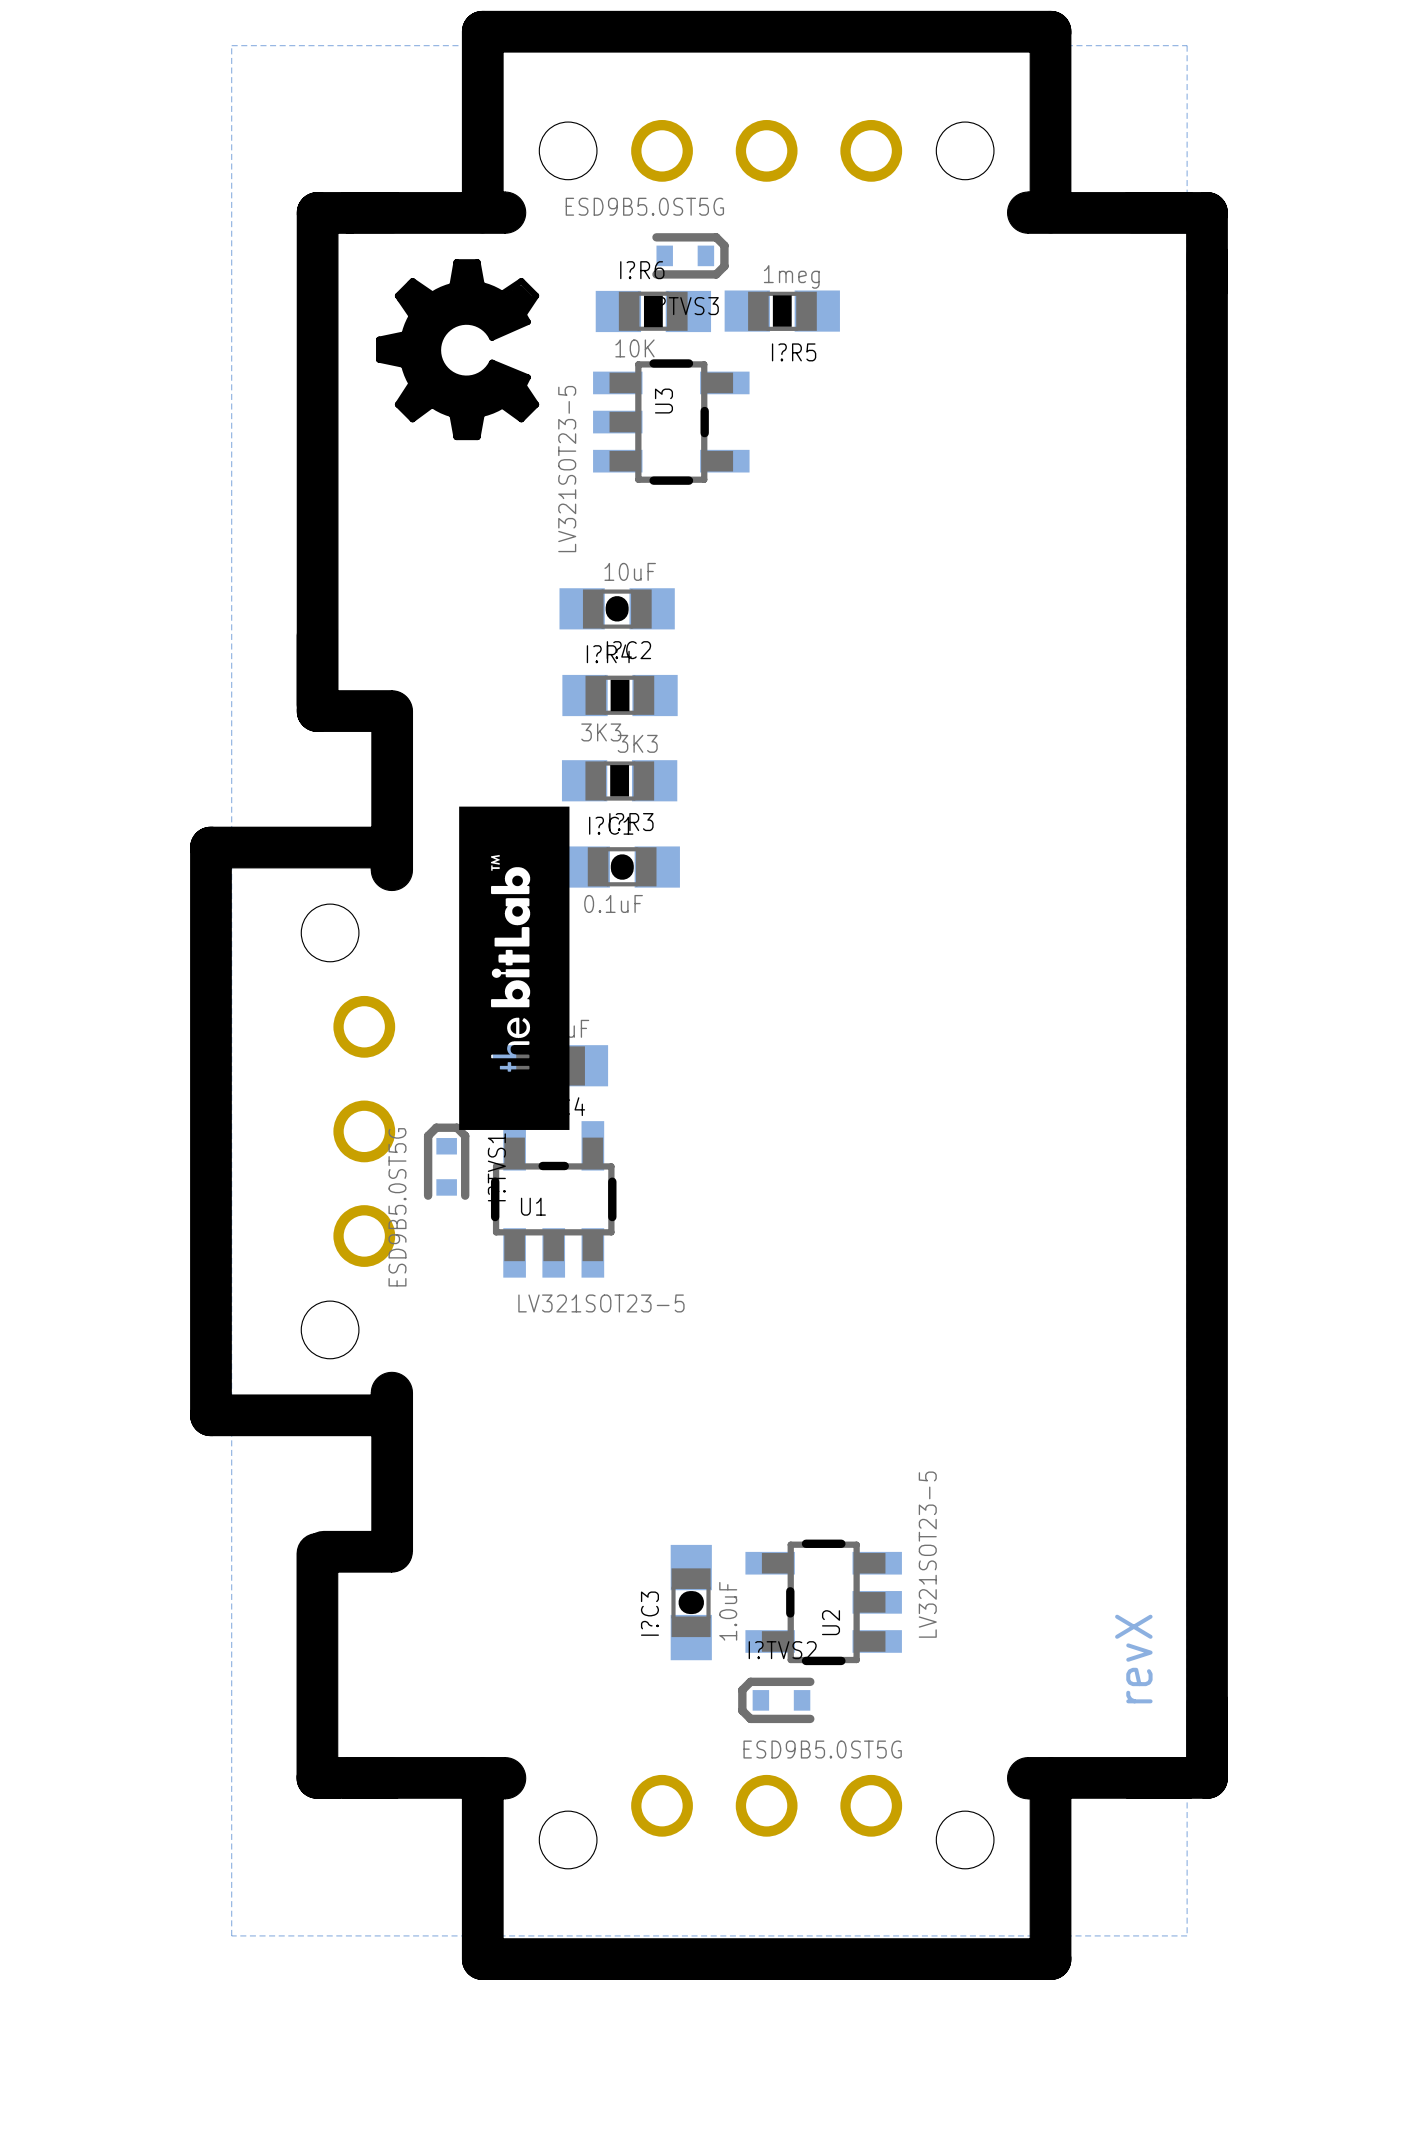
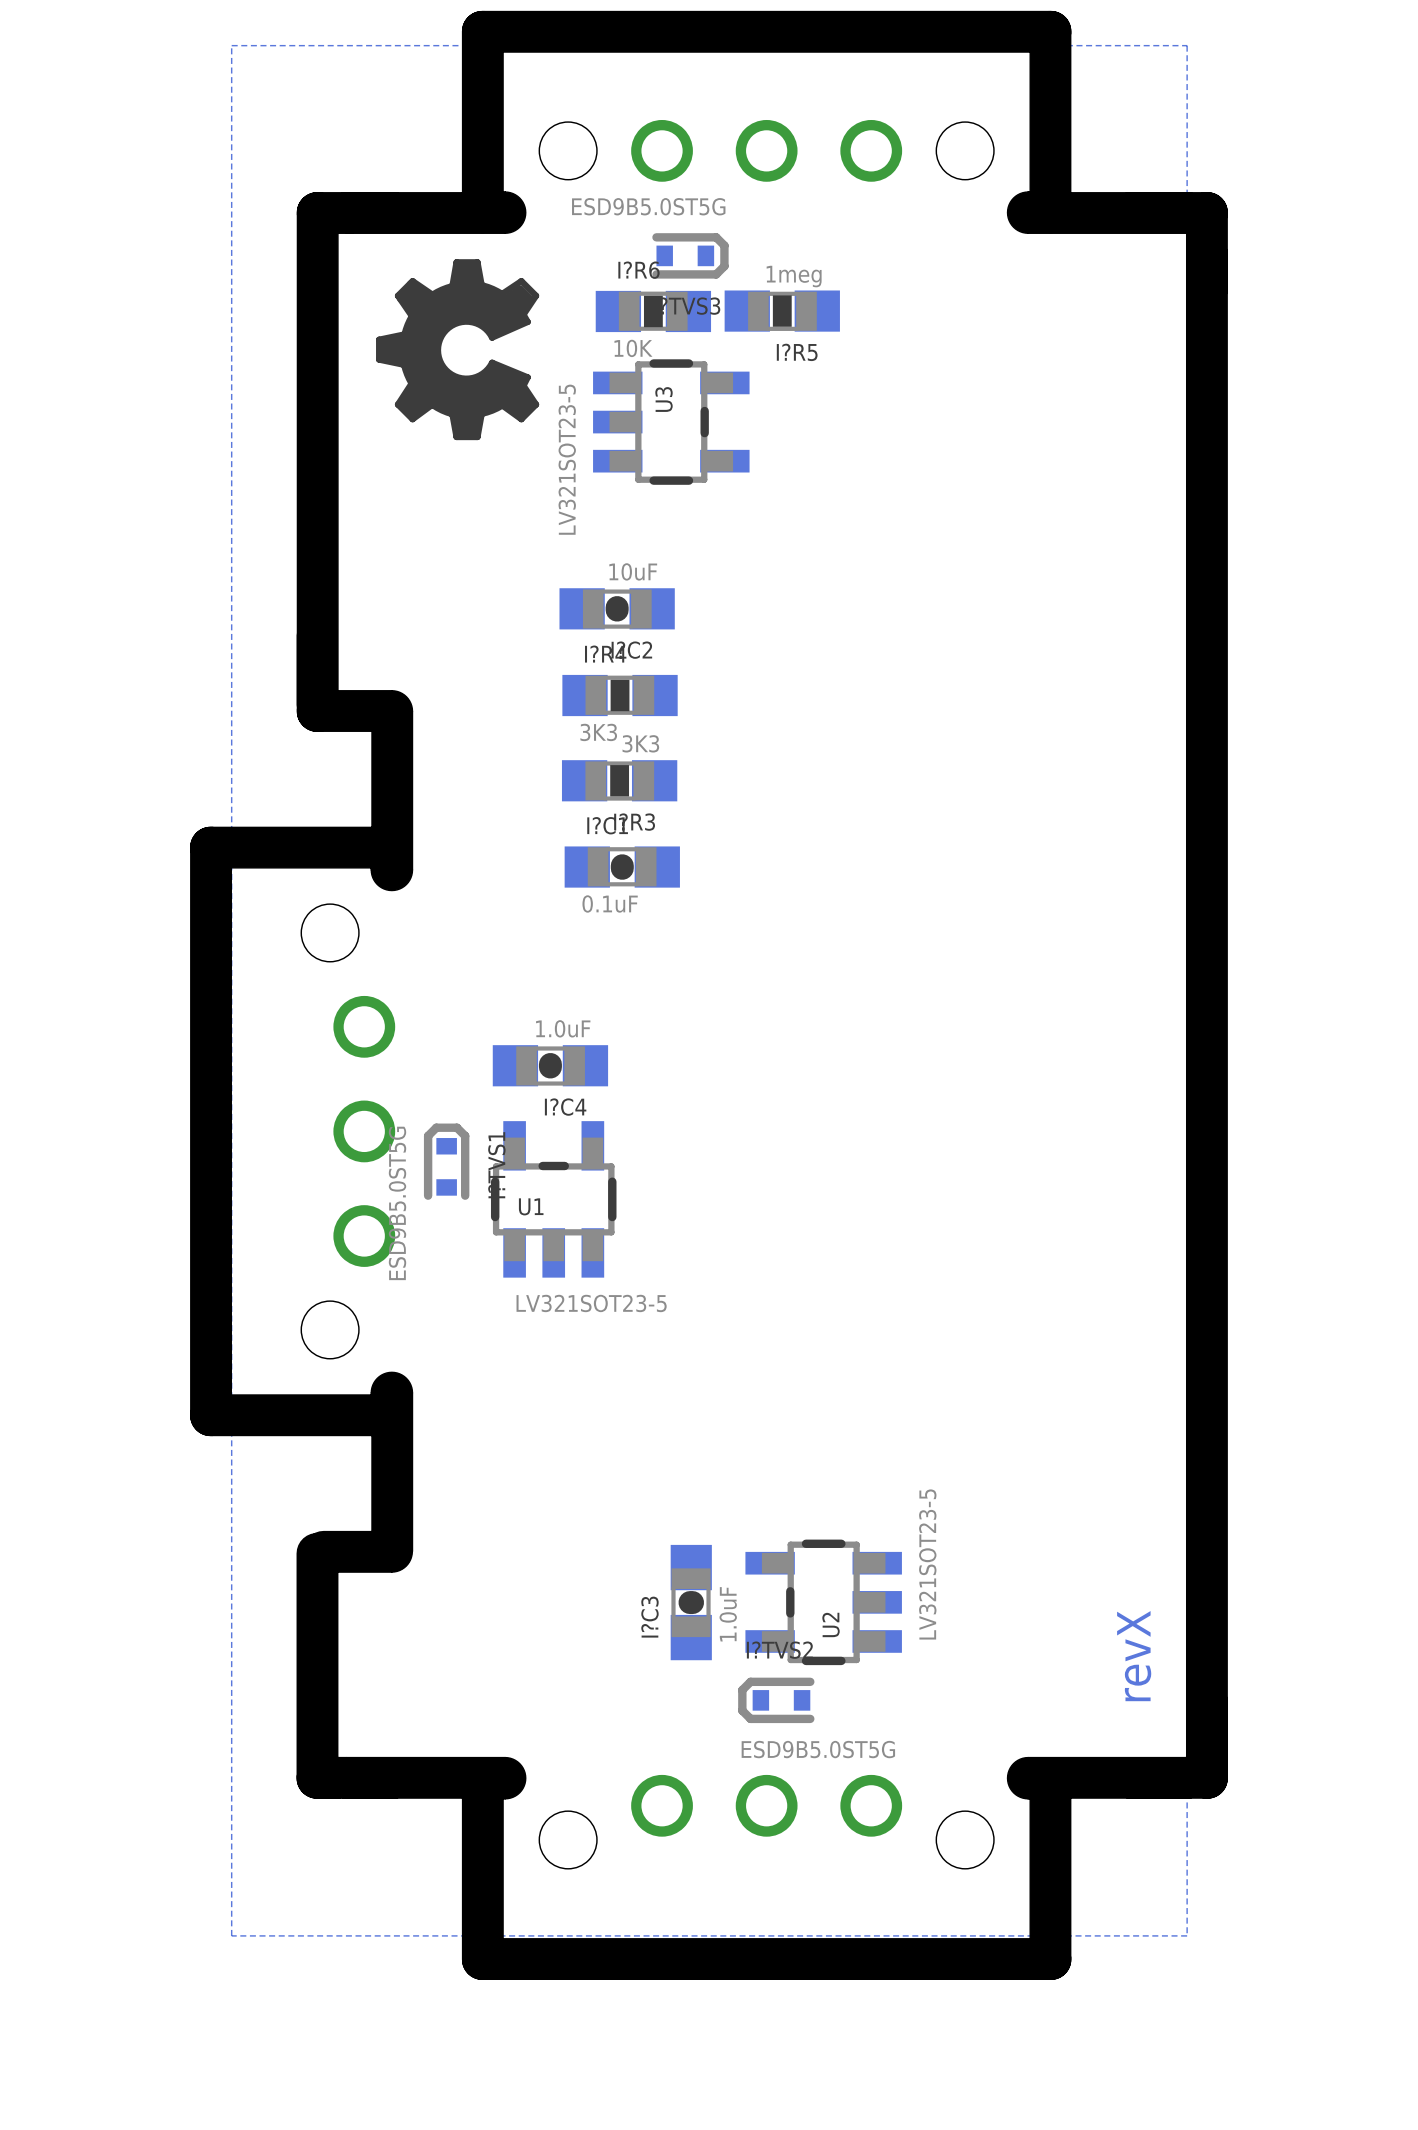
drawing: [459, 806, 570, 1130] -> none

